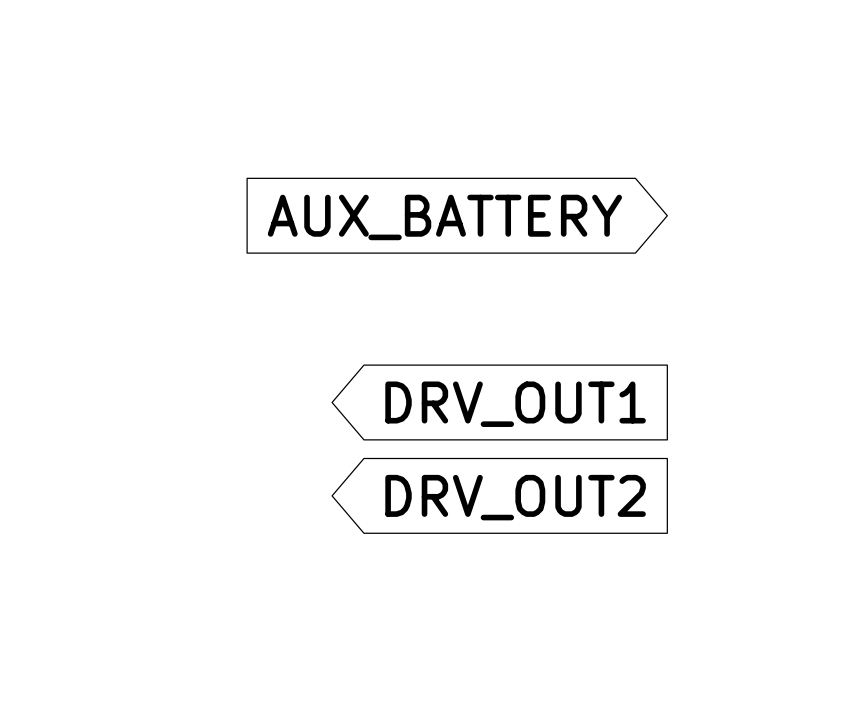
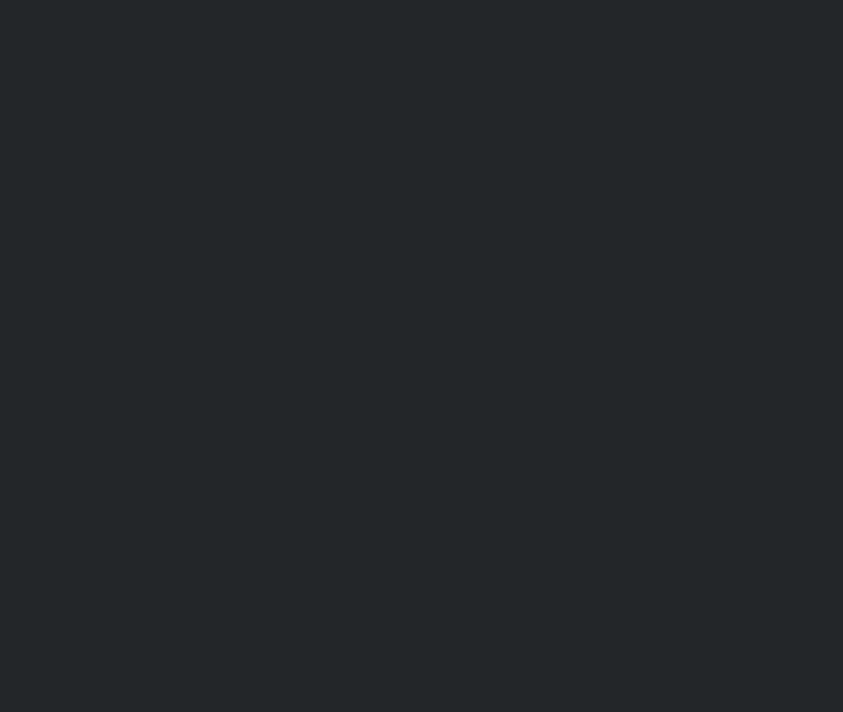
global label: AUX_BATTERY (444, 217) -> none
global label: DRV_OUT1 (515, 404) -> none
global label: DRV_OUT2 (515, 497) -> none

